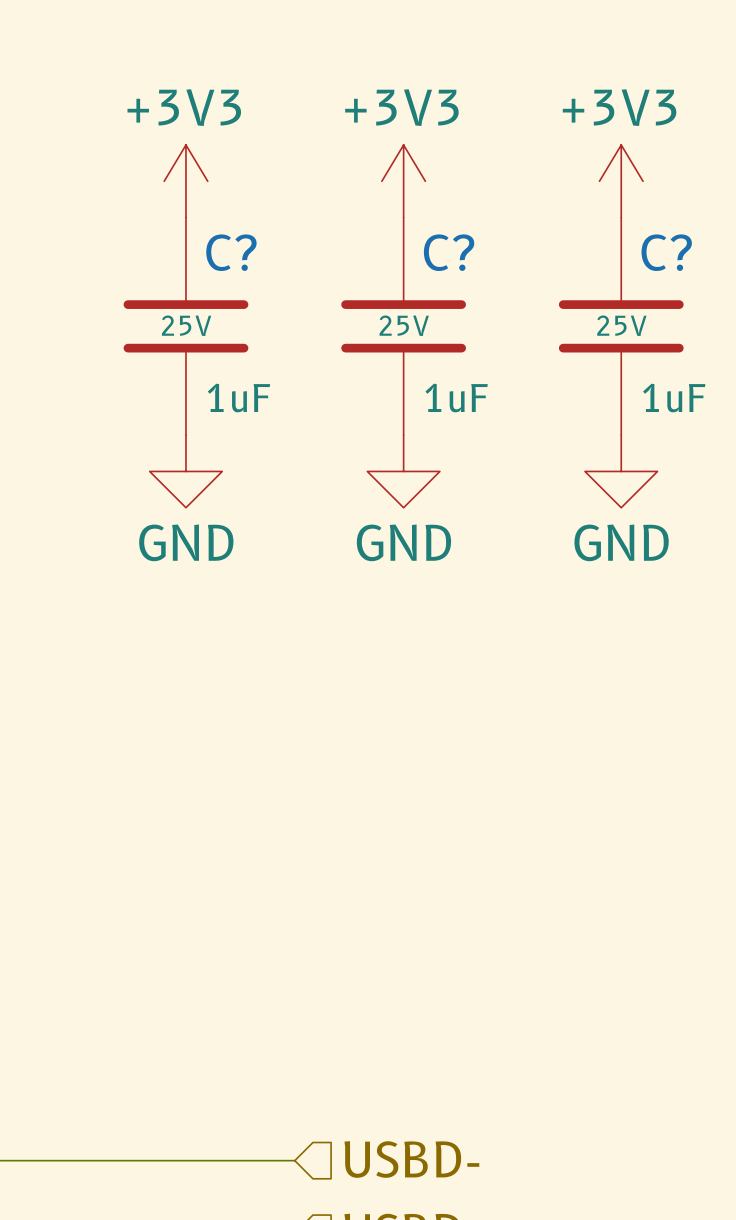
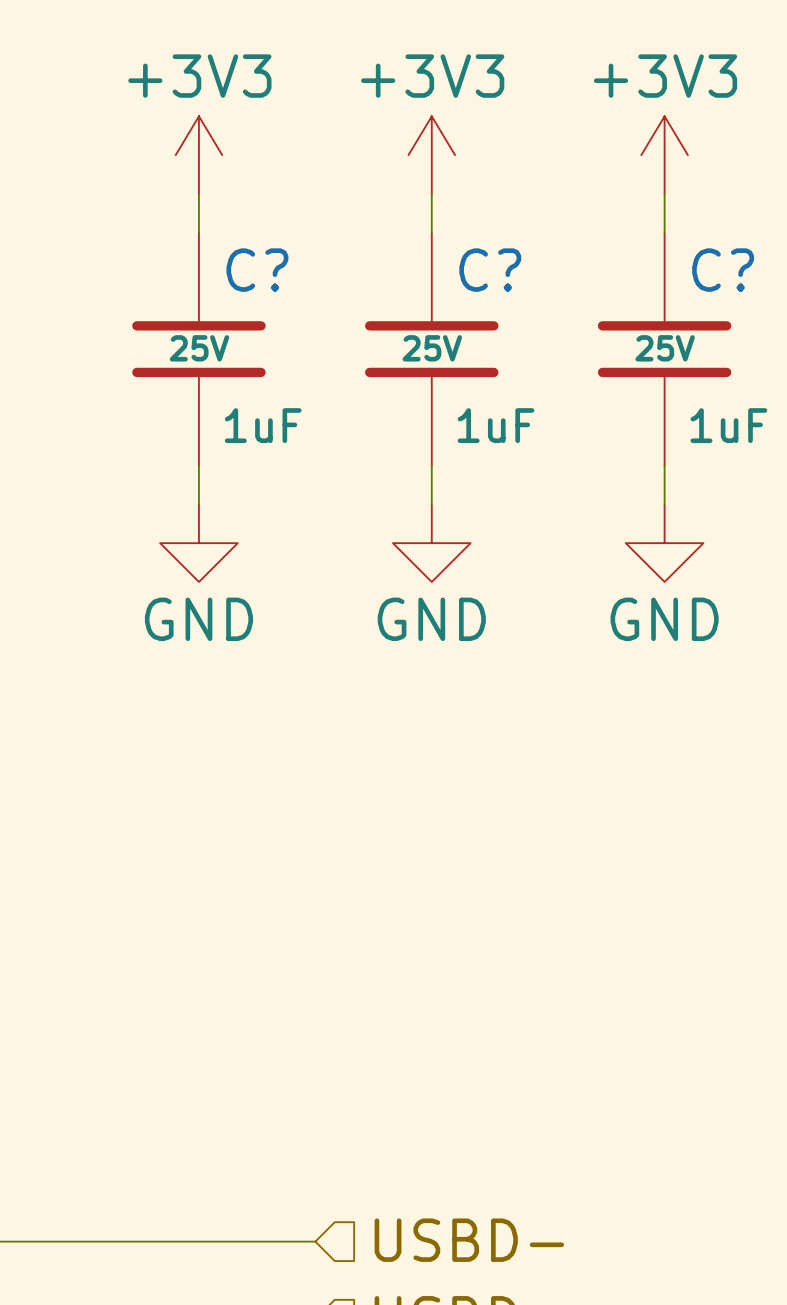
power symbol position: +3V3 (185, 181) -> +3V3 (198, 155)
power symbol position: +3V3 (403, 181) -> +3V3 (431, 155)
power symbol position: +3V3 (621, 181) -> +3V3 (664, 155)
power symbol position: GND (185, 471) -> GND (198, 543)
power symbol position: GND (403, 471) -> GND (431, 543)
power symbol position: GND (621, 471) -> GND (664, 543)

